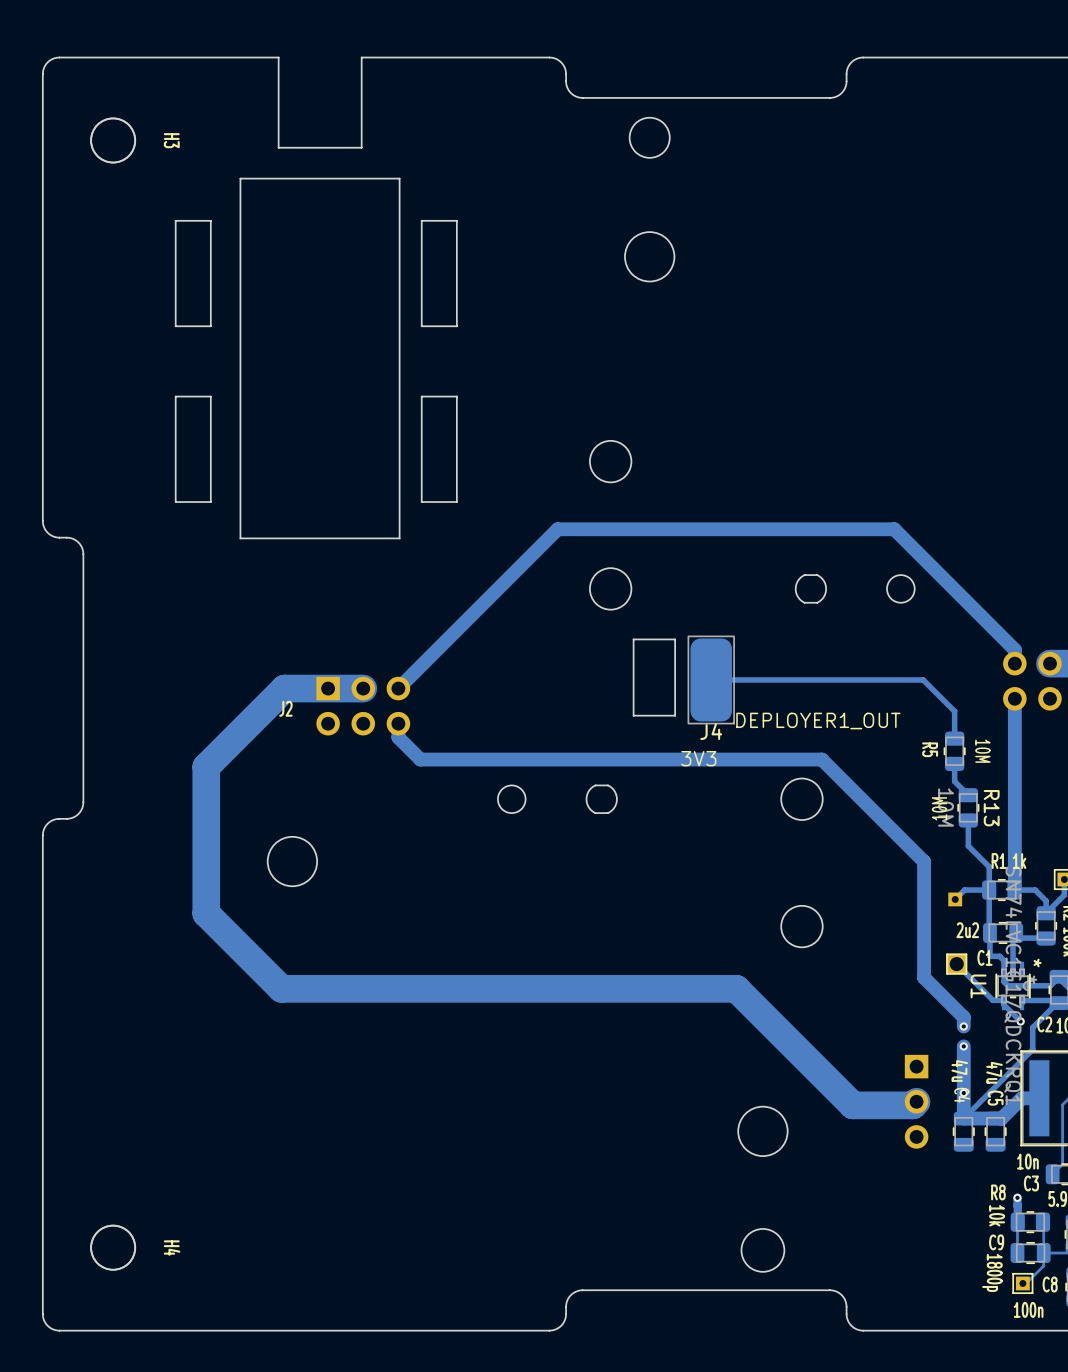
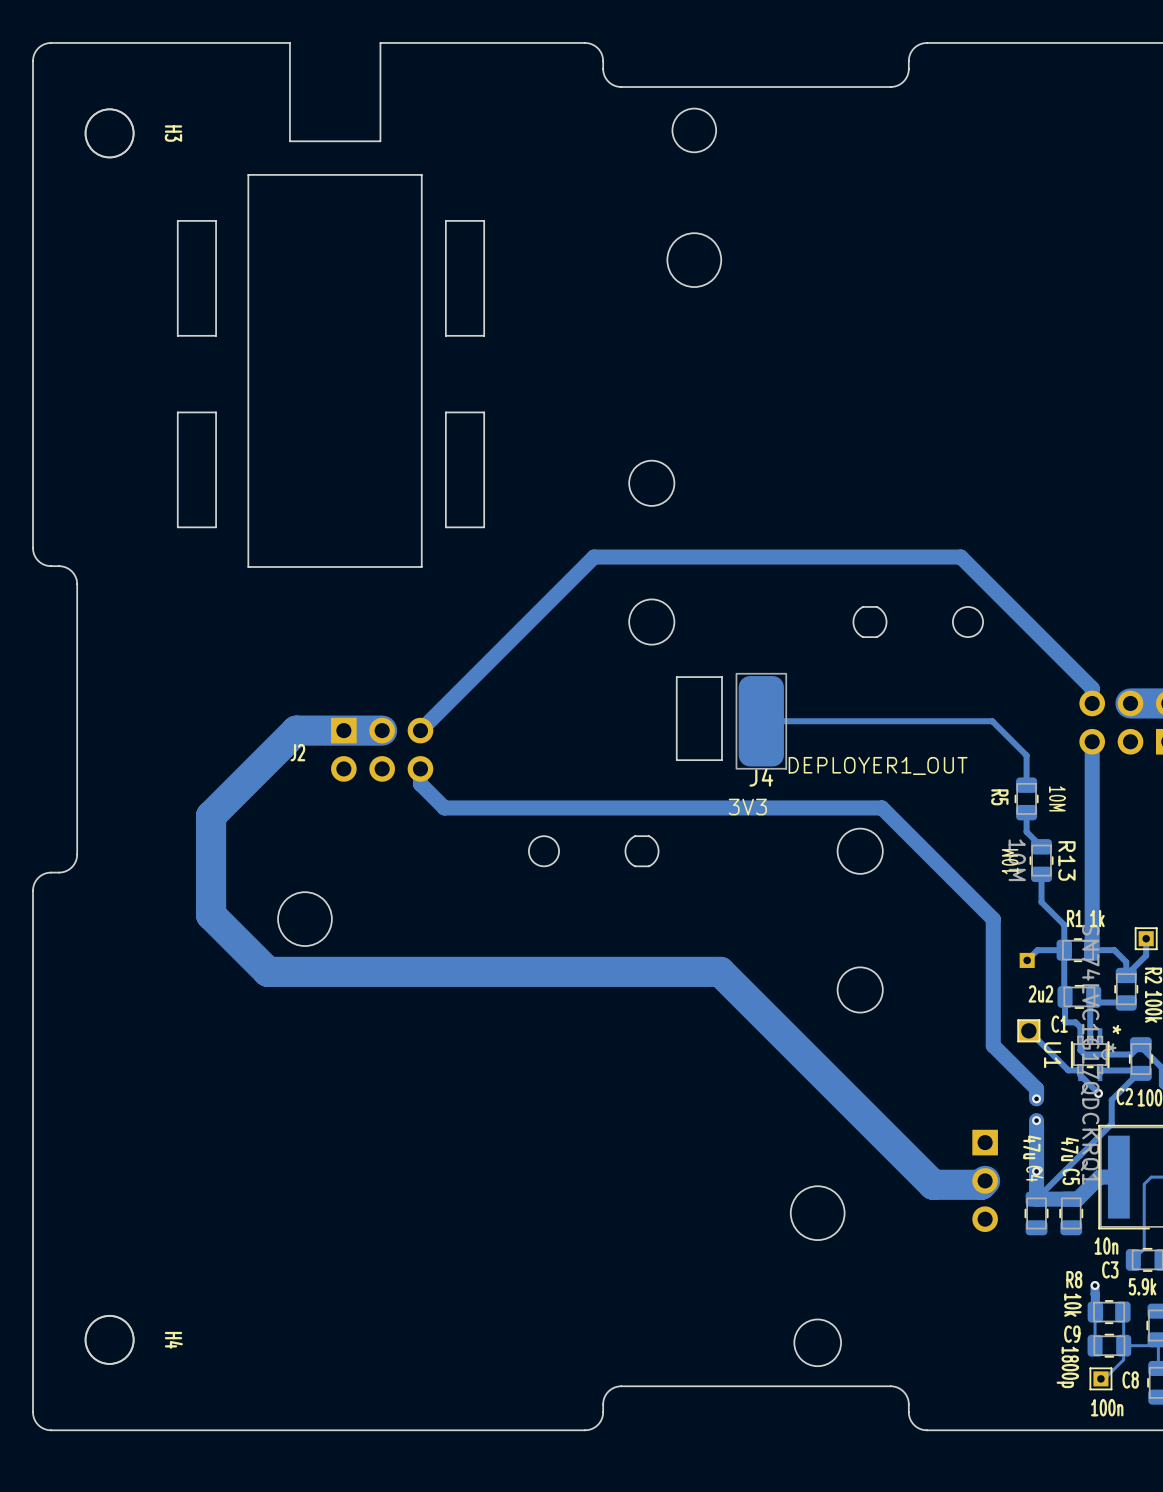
track: (206, 857) (206, 913) (281, 988) (736, 988) (852, 1105) (868, 1105) -> (211, 915) (267, 971) (720, 971) (933, 1184)

